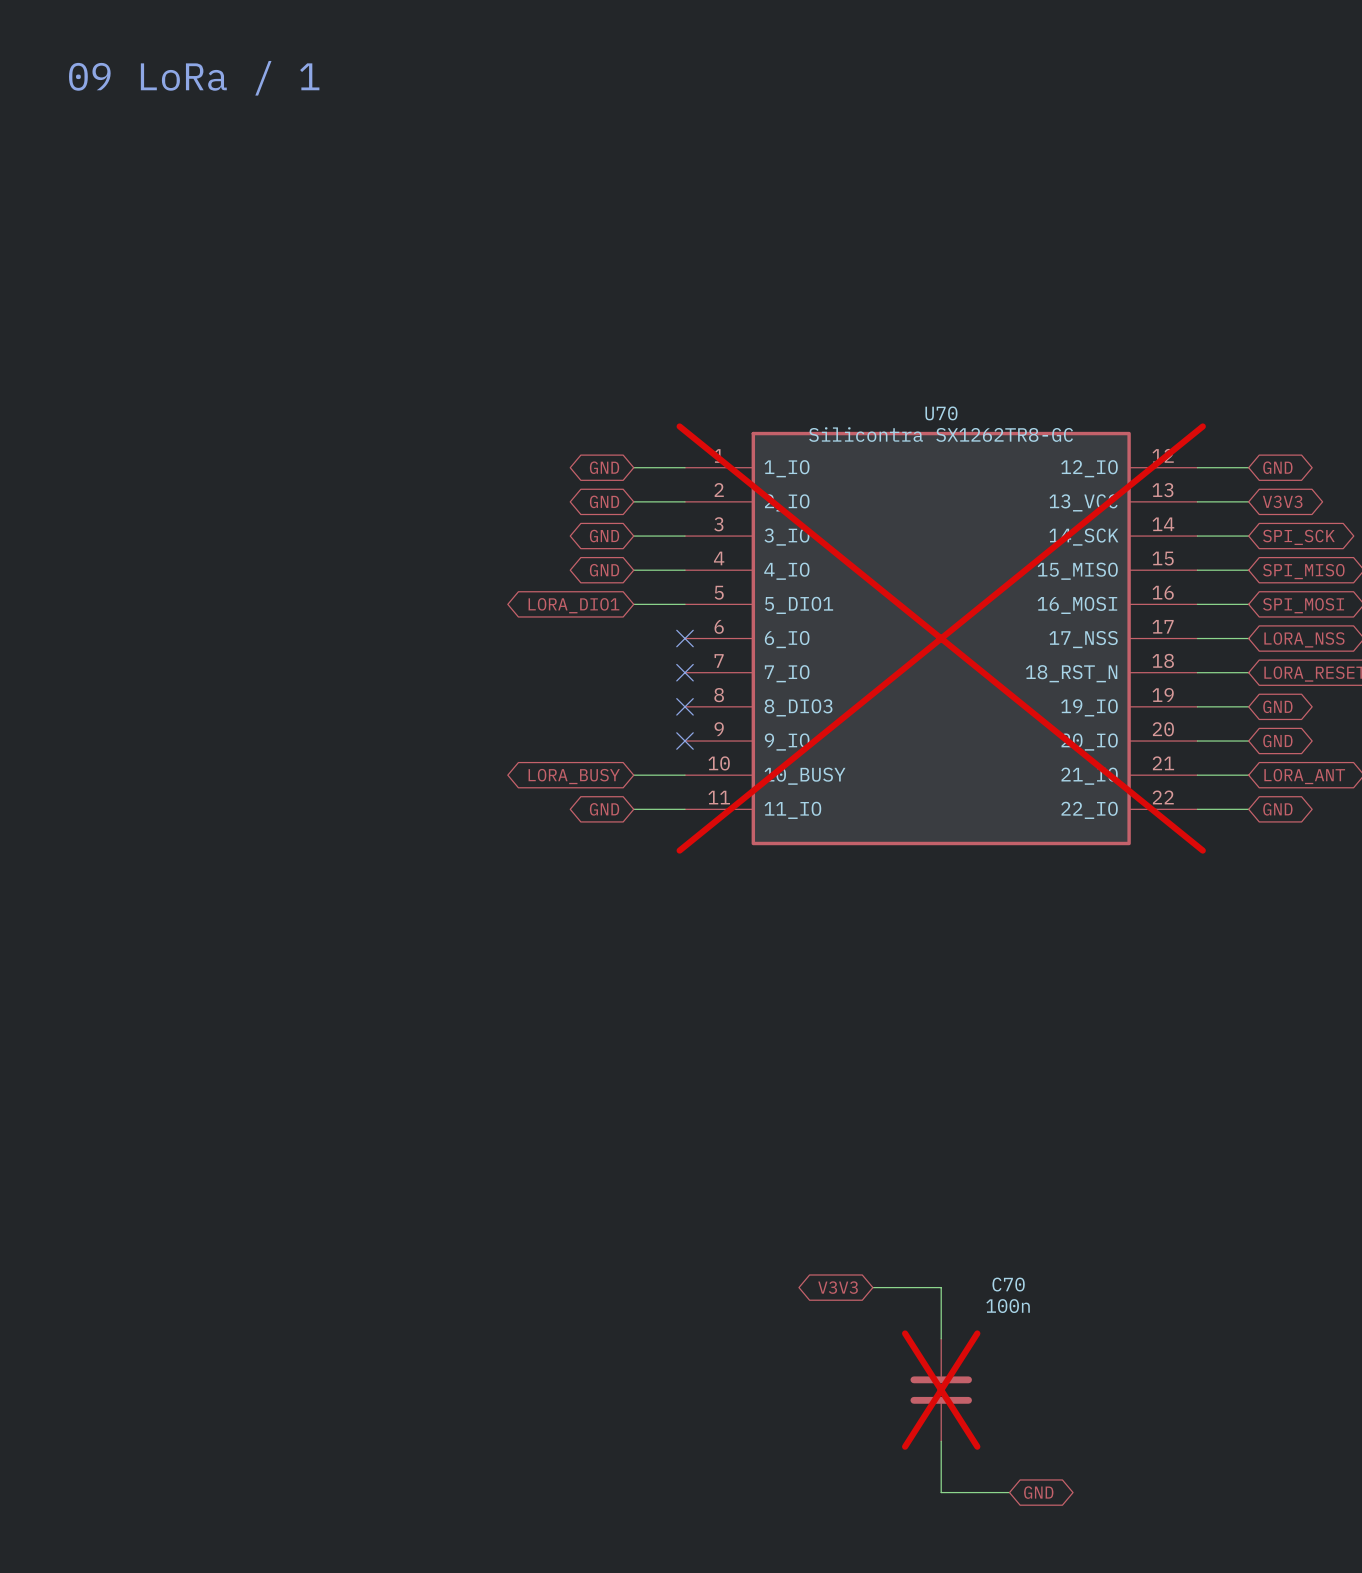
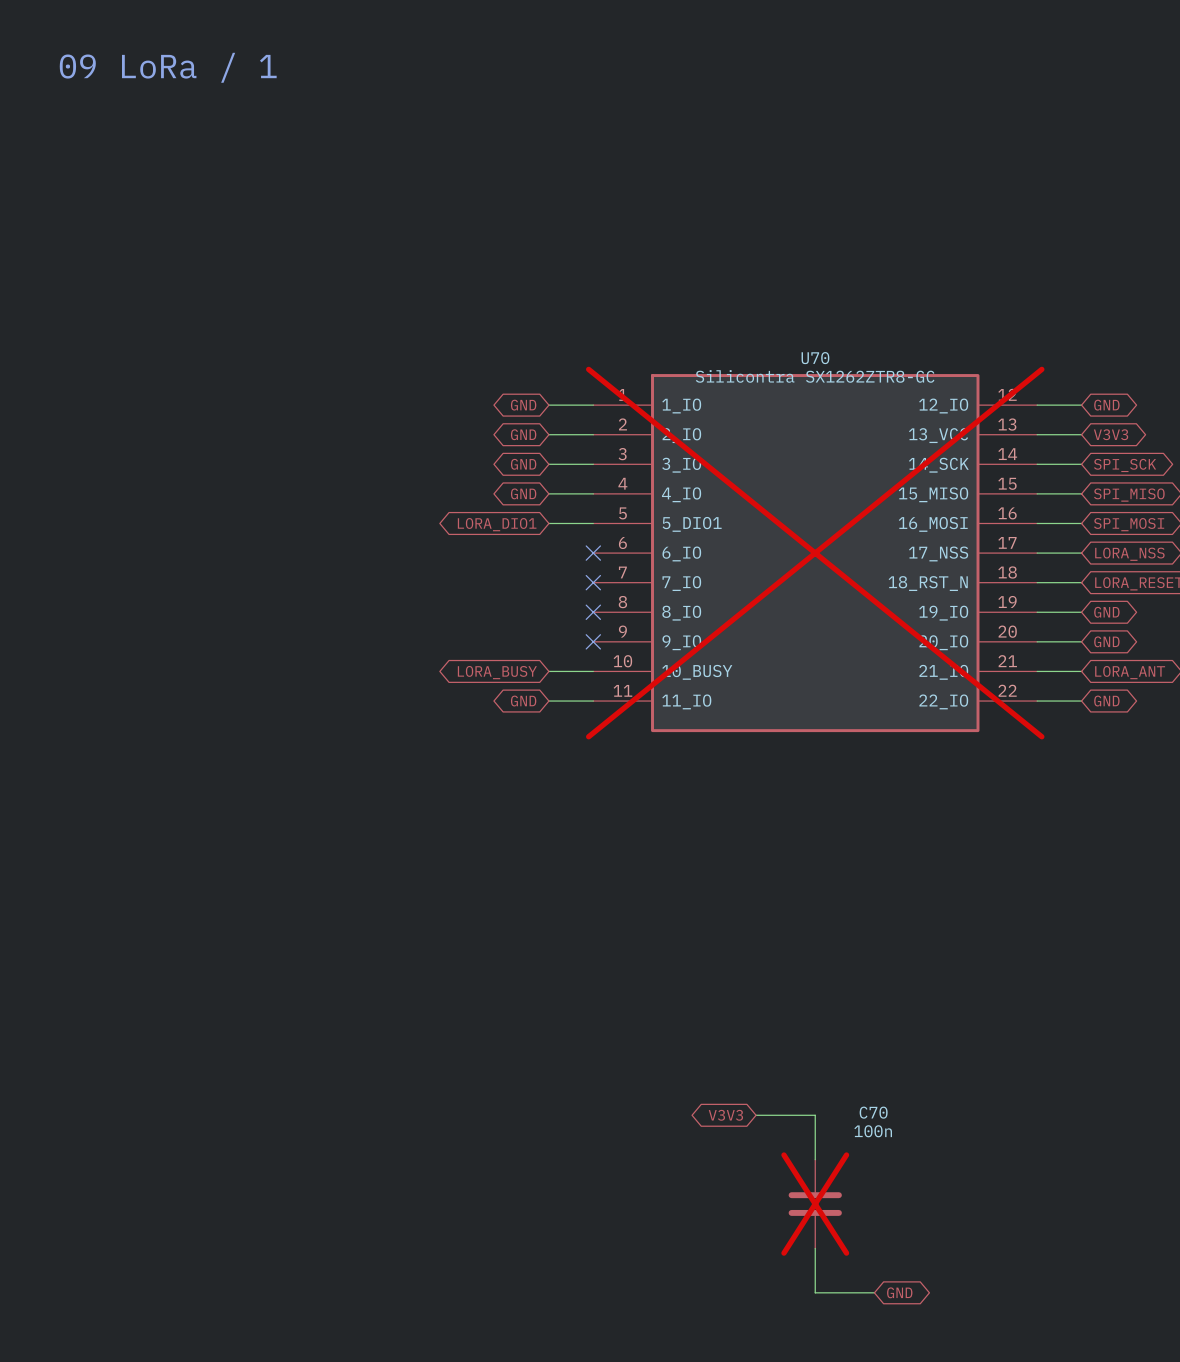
U70 value: Silicontra SX1262TR8-GC (941, 434) -> Silicontra SX1262ZTR8-GC (815, 376)
U70 pin name: 8_DIO3 (798, 707) -> 8_IO (681, 613)

